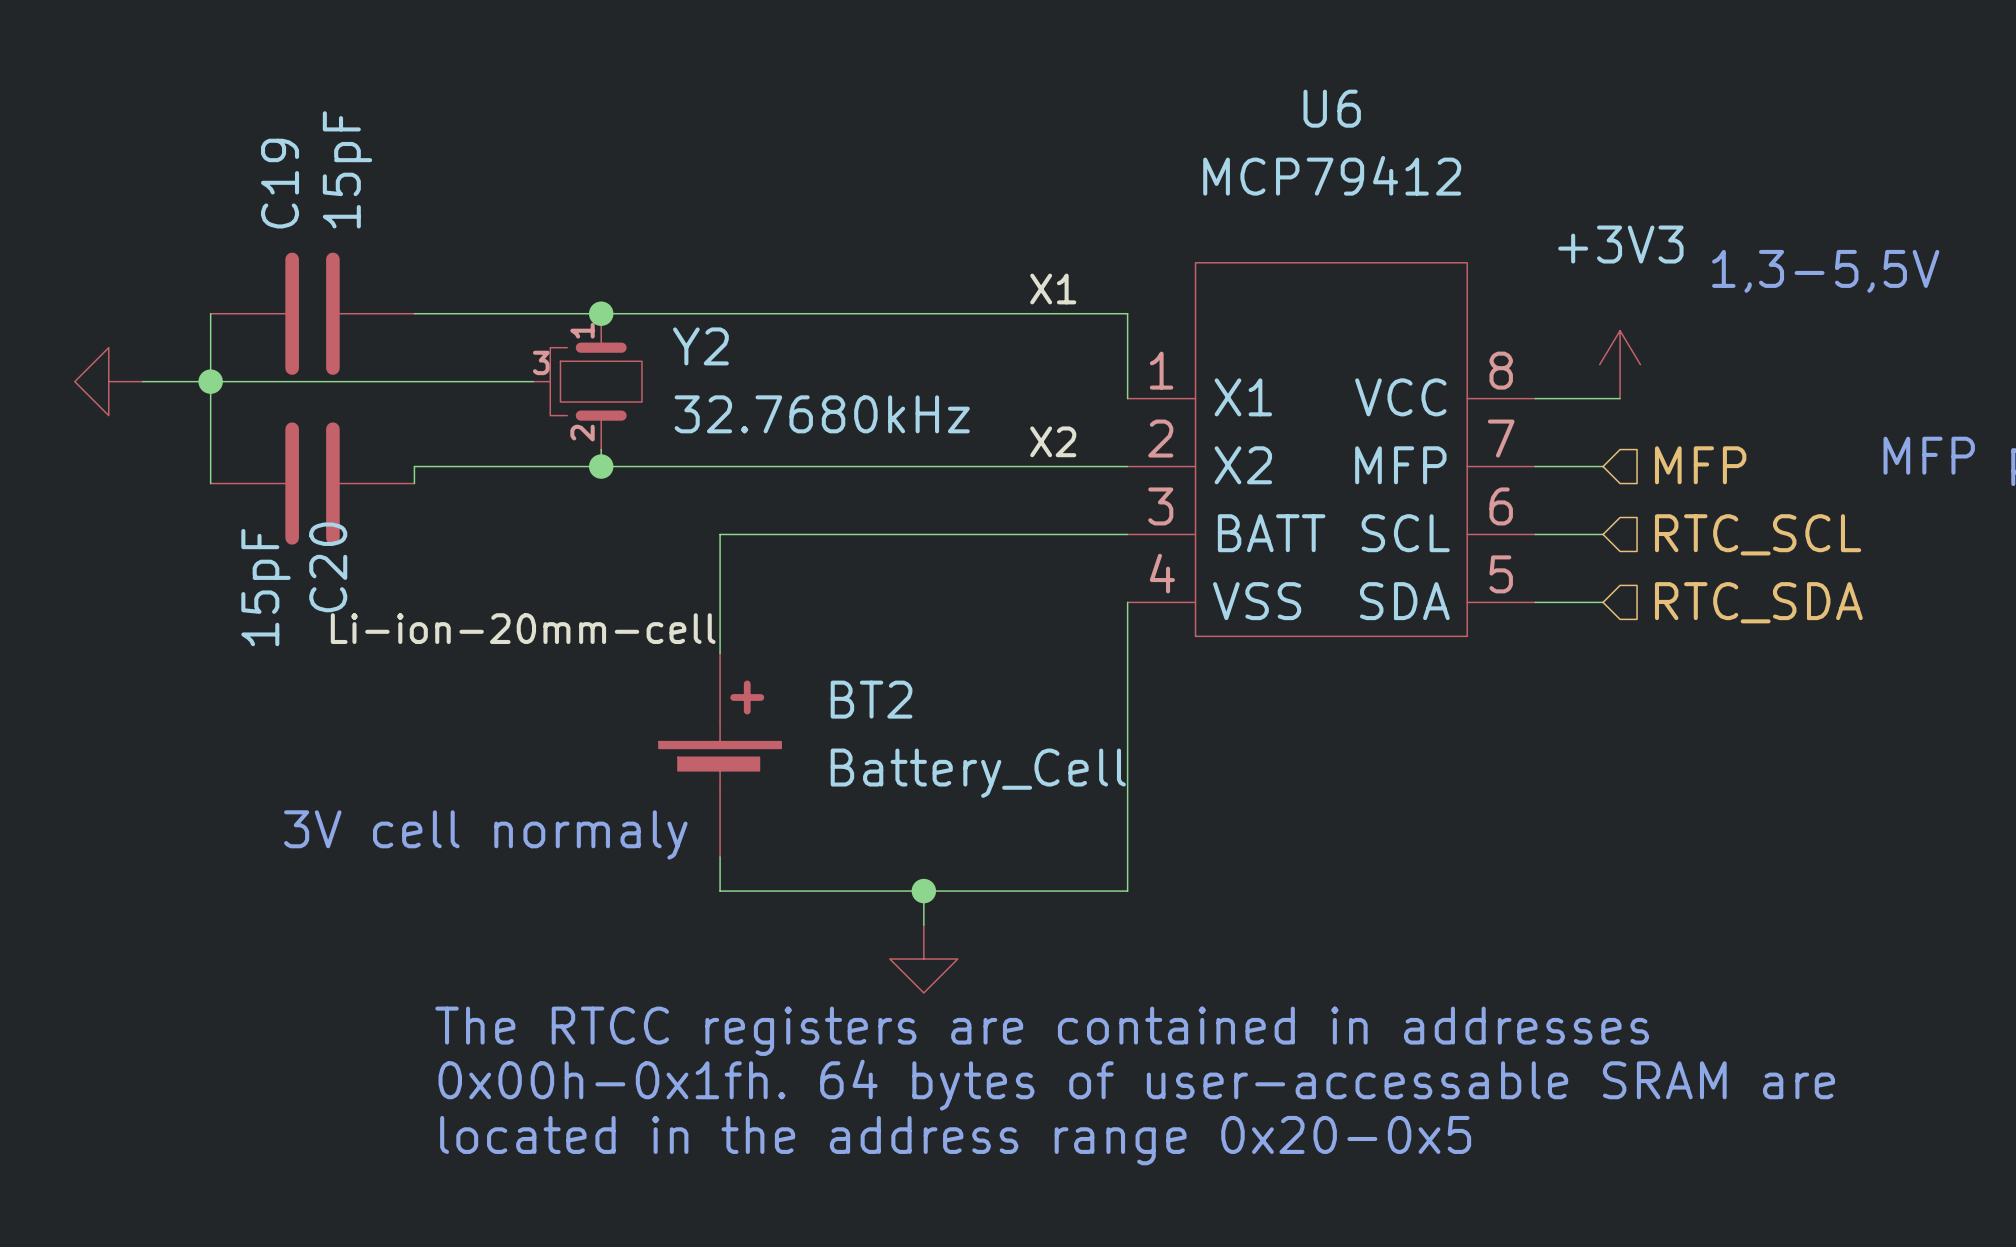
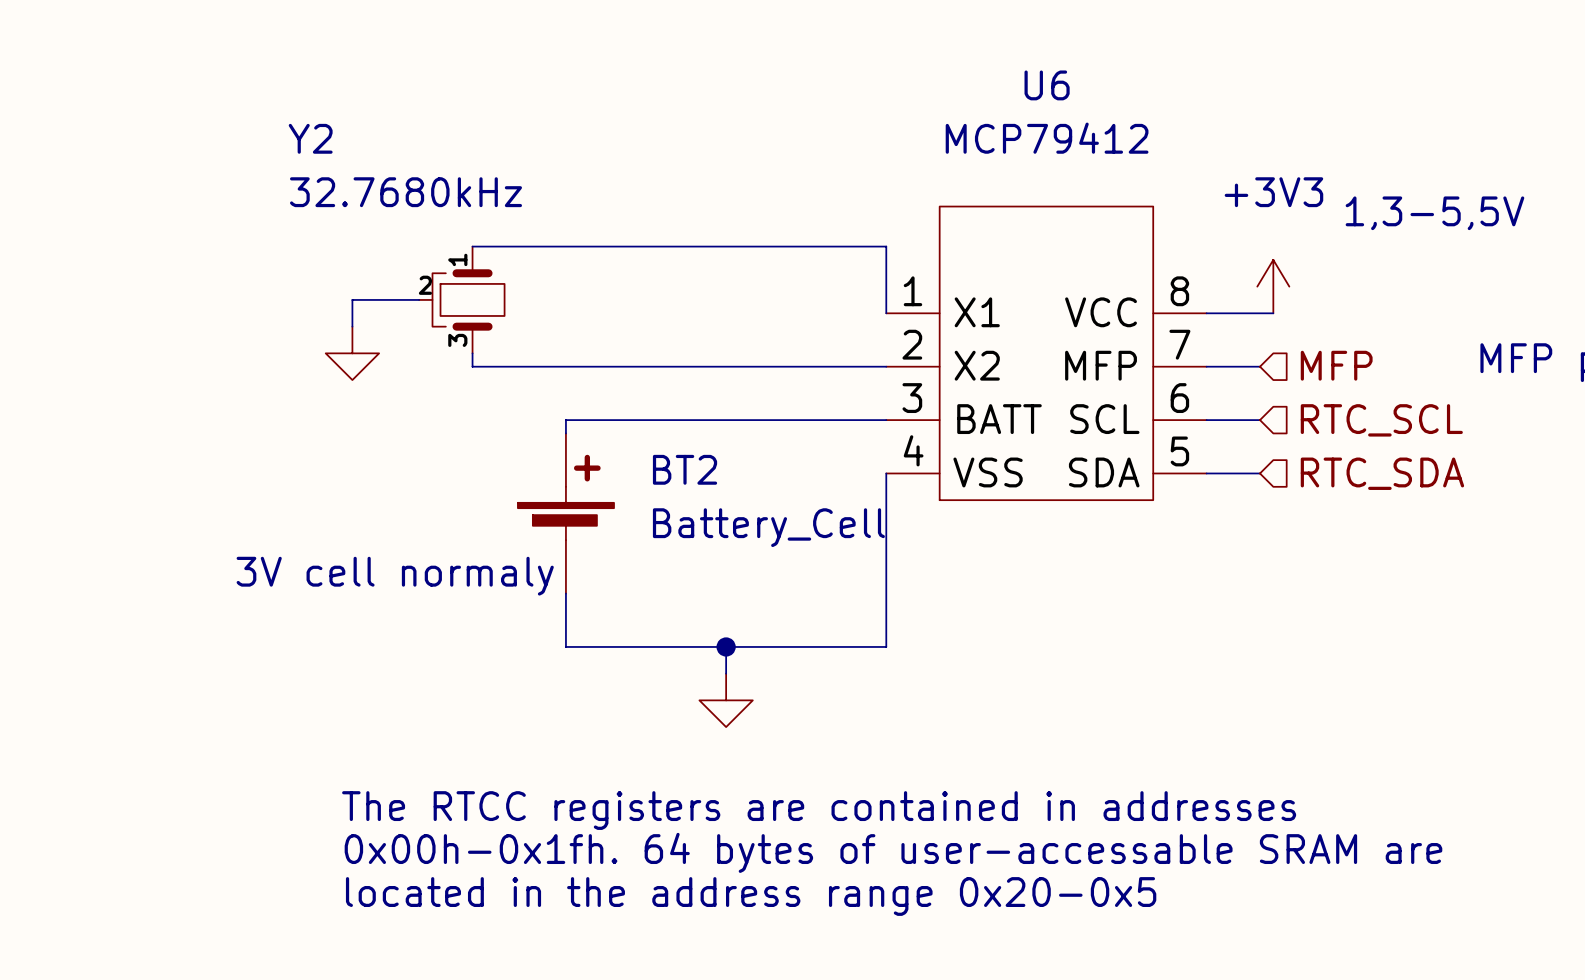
label: X1 (1053, 288) -> none
wire: (210, 313) (210, 483) -> none
C19: 15pF (312, 313) -> none
wire: (414, 313) (601, 313) -> none
junction: (601, 313) -> none
Y2 name position: Y2 (700, 346) -> Y2 (310, 138)
Y2 pin number: 3 (541, 362) -> 2 (425, 285)
power symbol rotation: 0° (108, 381) -> 90° counterclockwise (352, 353)
power symbol position: (108, 381) -> (352, 353)
wire: (142, 381) (448, 381) -> (352, 326) (352, 299)
junction: (210, 381) -> none
Y2 value position: 32.7680kHz (822, 414) -> 32.7680kHz (406, 192)
Y2 pin number: 2 (582, 433) -> 3 (457, 340)
label: X2 (1053, 441) -> none
wire: (601, 466) (414, 466) (414, 483) -> none
junction: (601, 466) -> none
C20: 15pF (312, 483) -> none
label: Li-ion-20mm-cell (523, 628) -> none
BT2 position: (720, 755) -> (565, 513)
wire: (1127, 823) (1127, 891) (720, 891) (720, 857) -> (886, 646) (565, 646) (565, 593)
text position: 3V cell normaly (485, 834) -> 3V cell normaly (395, 576)
wire: (923, 891) (923, 925) -> (726, 646) (726, 673)
junction position: (923, 891) -> (726, 646)
power symbol position: (923, 958) -> (726, 700)

